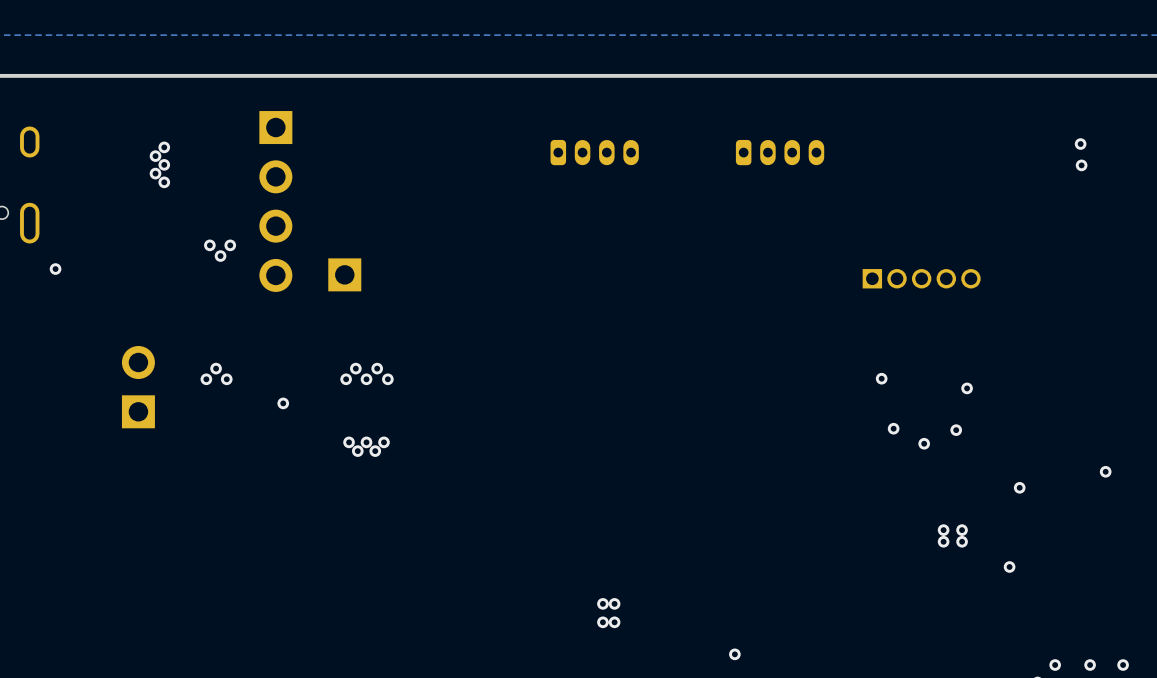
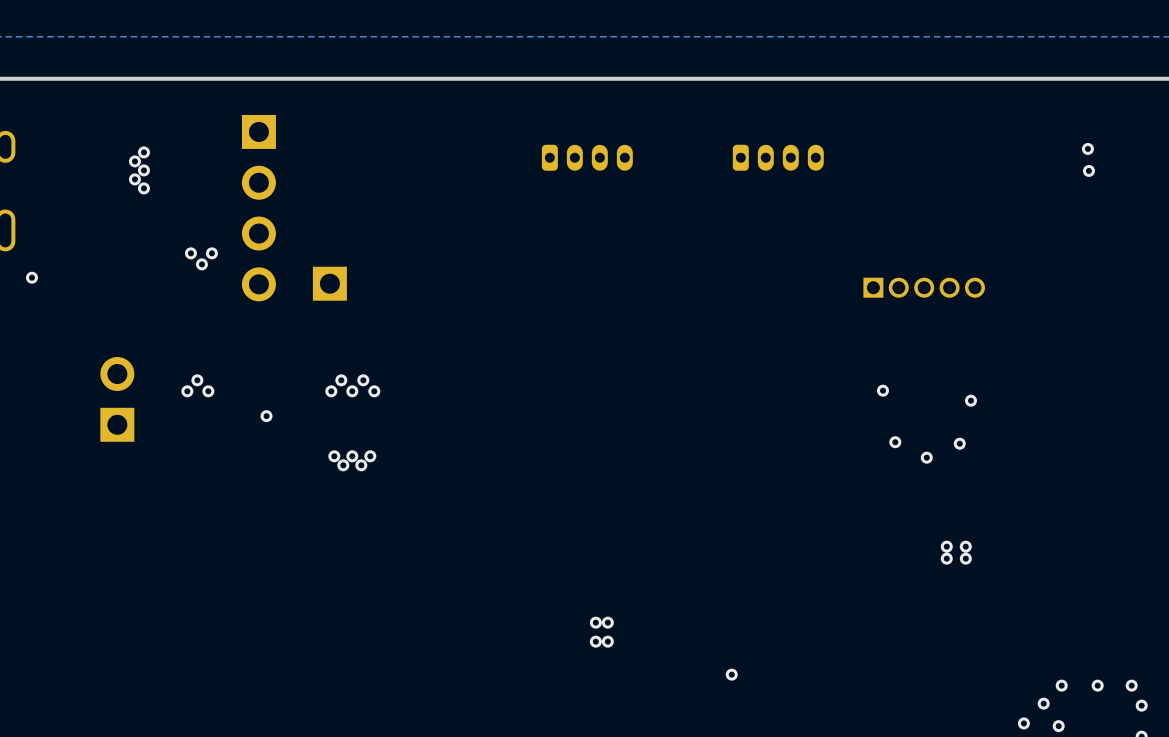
via: (1105, 471) -> none
via: (1019, 487) -> none
via: (1009, 566) -> none

